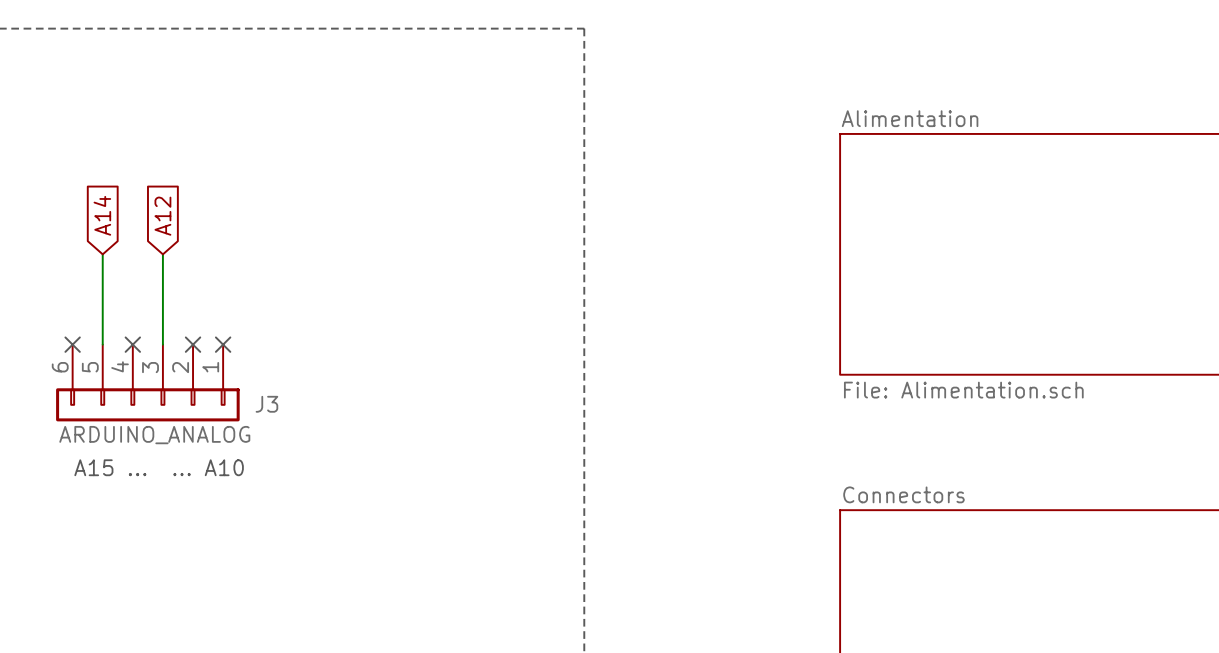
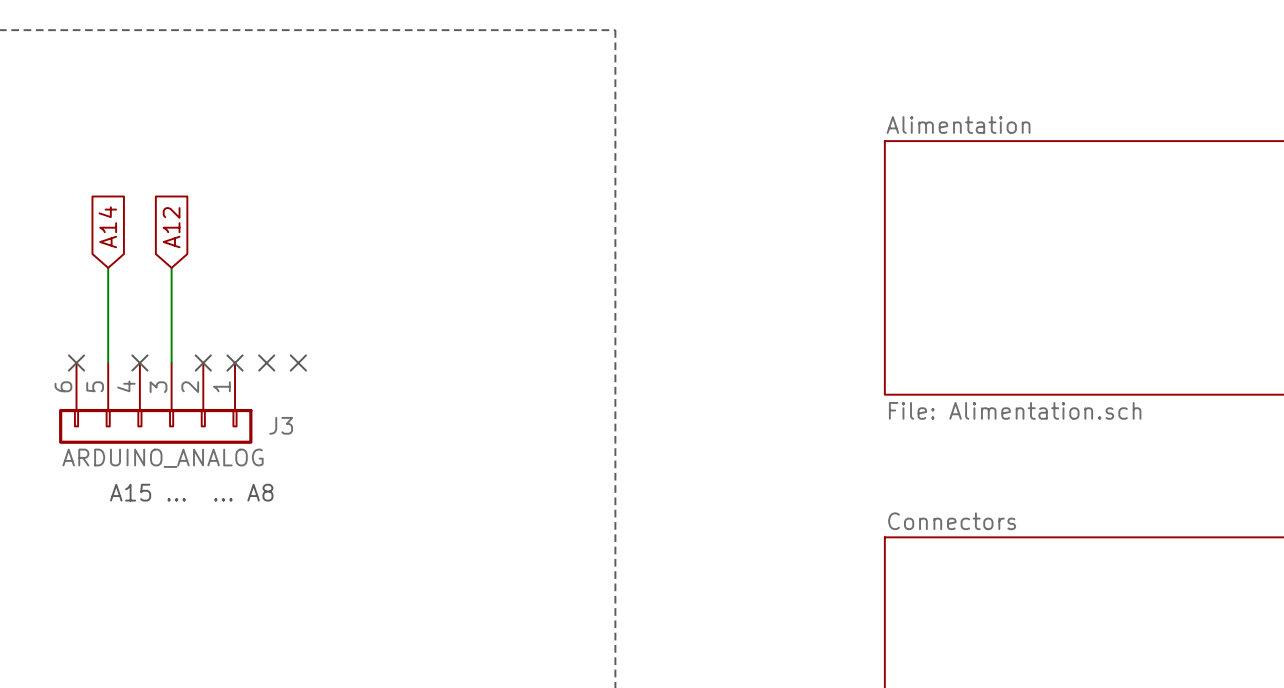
no-connect mark: none -> (266, 363)
no-connect mark: none -> (298, 363)
text: A15 ... ... A10 (159, 467) -> A15 ... ... A8 (191, 492)

